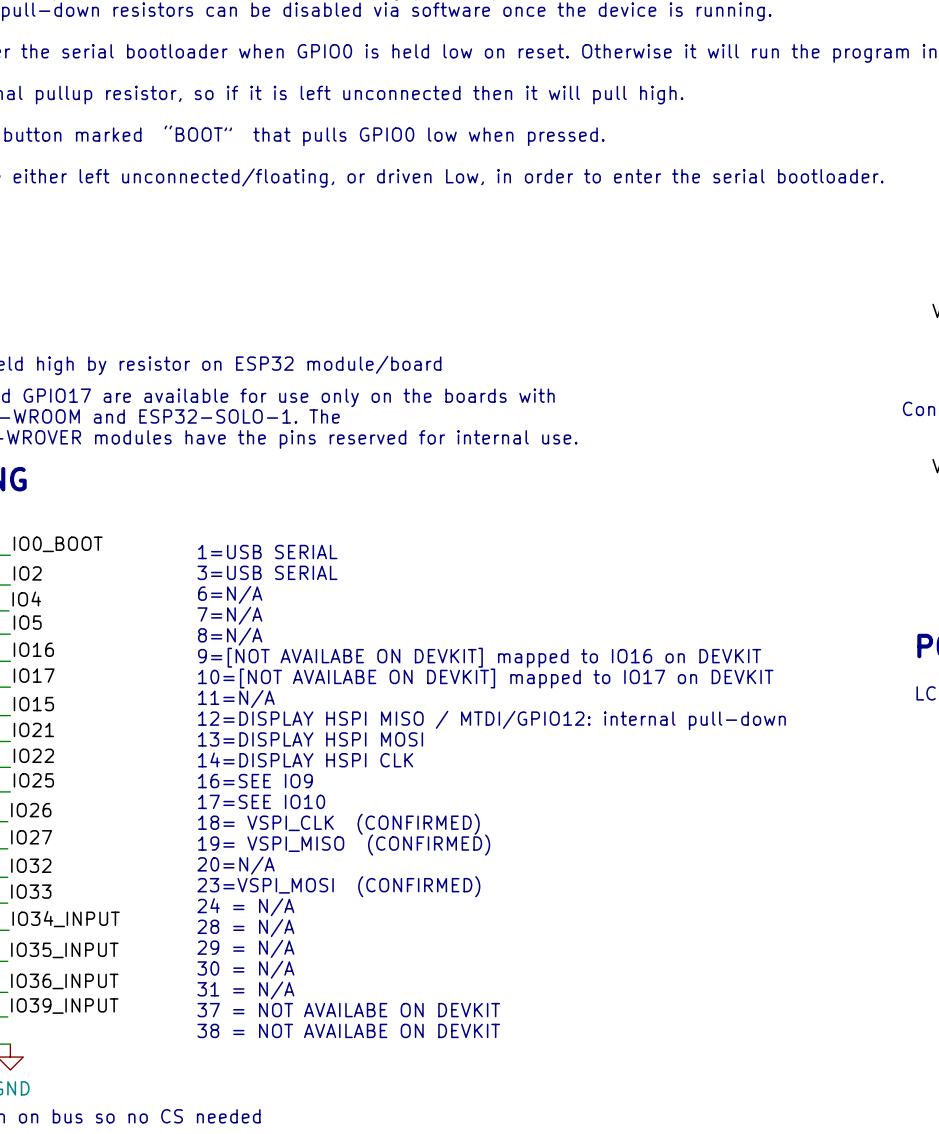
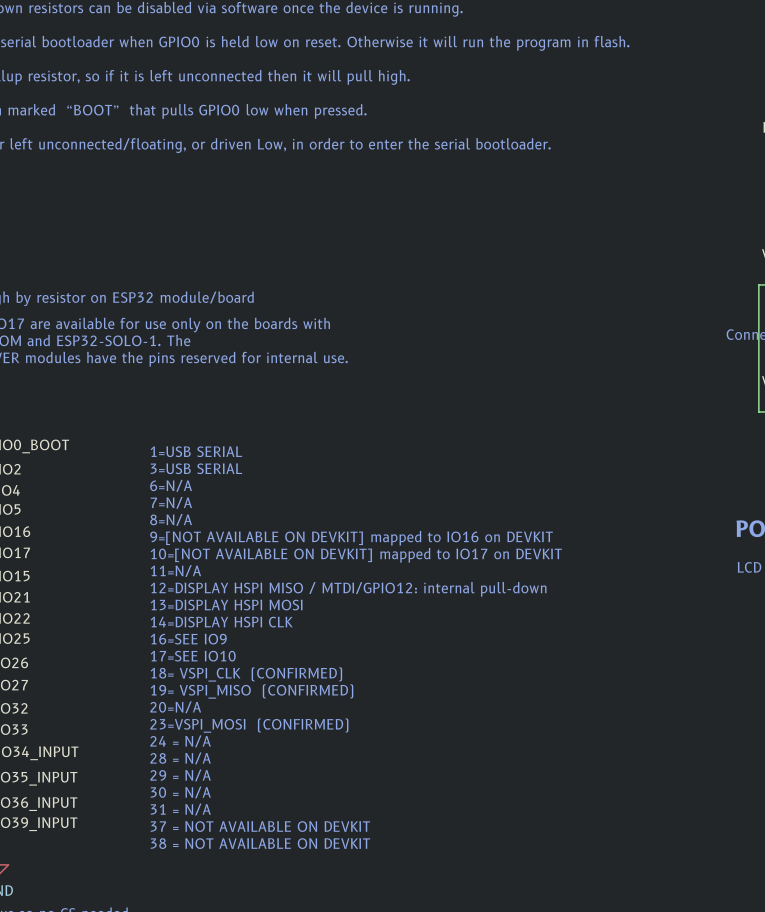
text: 9=[NOT AVAILABE ON DEVKIT] mapped to IO16 on DEVKIT (479, 657) -> 9=[NOT AVAILABLE ON DEVKIT] mapped to IO16 on DEVKIT (351, 538)
text: 10=[NOT AVAILABE ON DEVKIT] mapped to IO17 on DEVKIT (485, 678) -> 10=[NOT AVAILABLE ON DEVKIT] mapped to IO17 on DEVKIT (356, 555)
text: 37 = NOT AVAILABE ON DEVKIT (348, 1010) -> 37 = NOT AVAILABLE ON DEVKIT (260, 826)
text: 38 = NOT AVAILABE ON DEVKIT (348, 1030) -> 38 = NOT AVAILABLE ON DEVKIT (260, 843)

